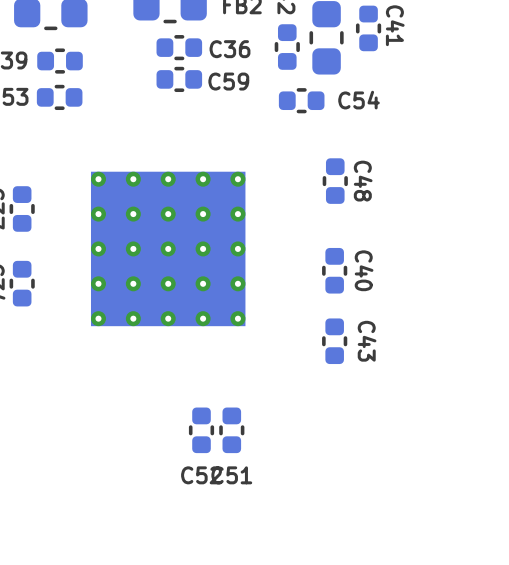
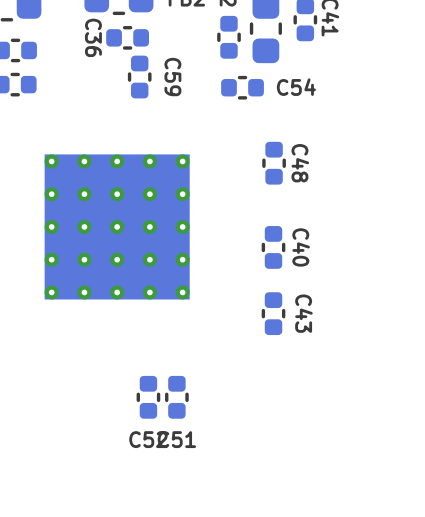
C36 name rotation: 0° (230, 49) -> 90° clockwise (93, 37)
C36 name position: C36 (230, 49) -> C36 (93, 37)
C59 rotation: 0° (179, 79) -> 90° clockwise (139, 77)

